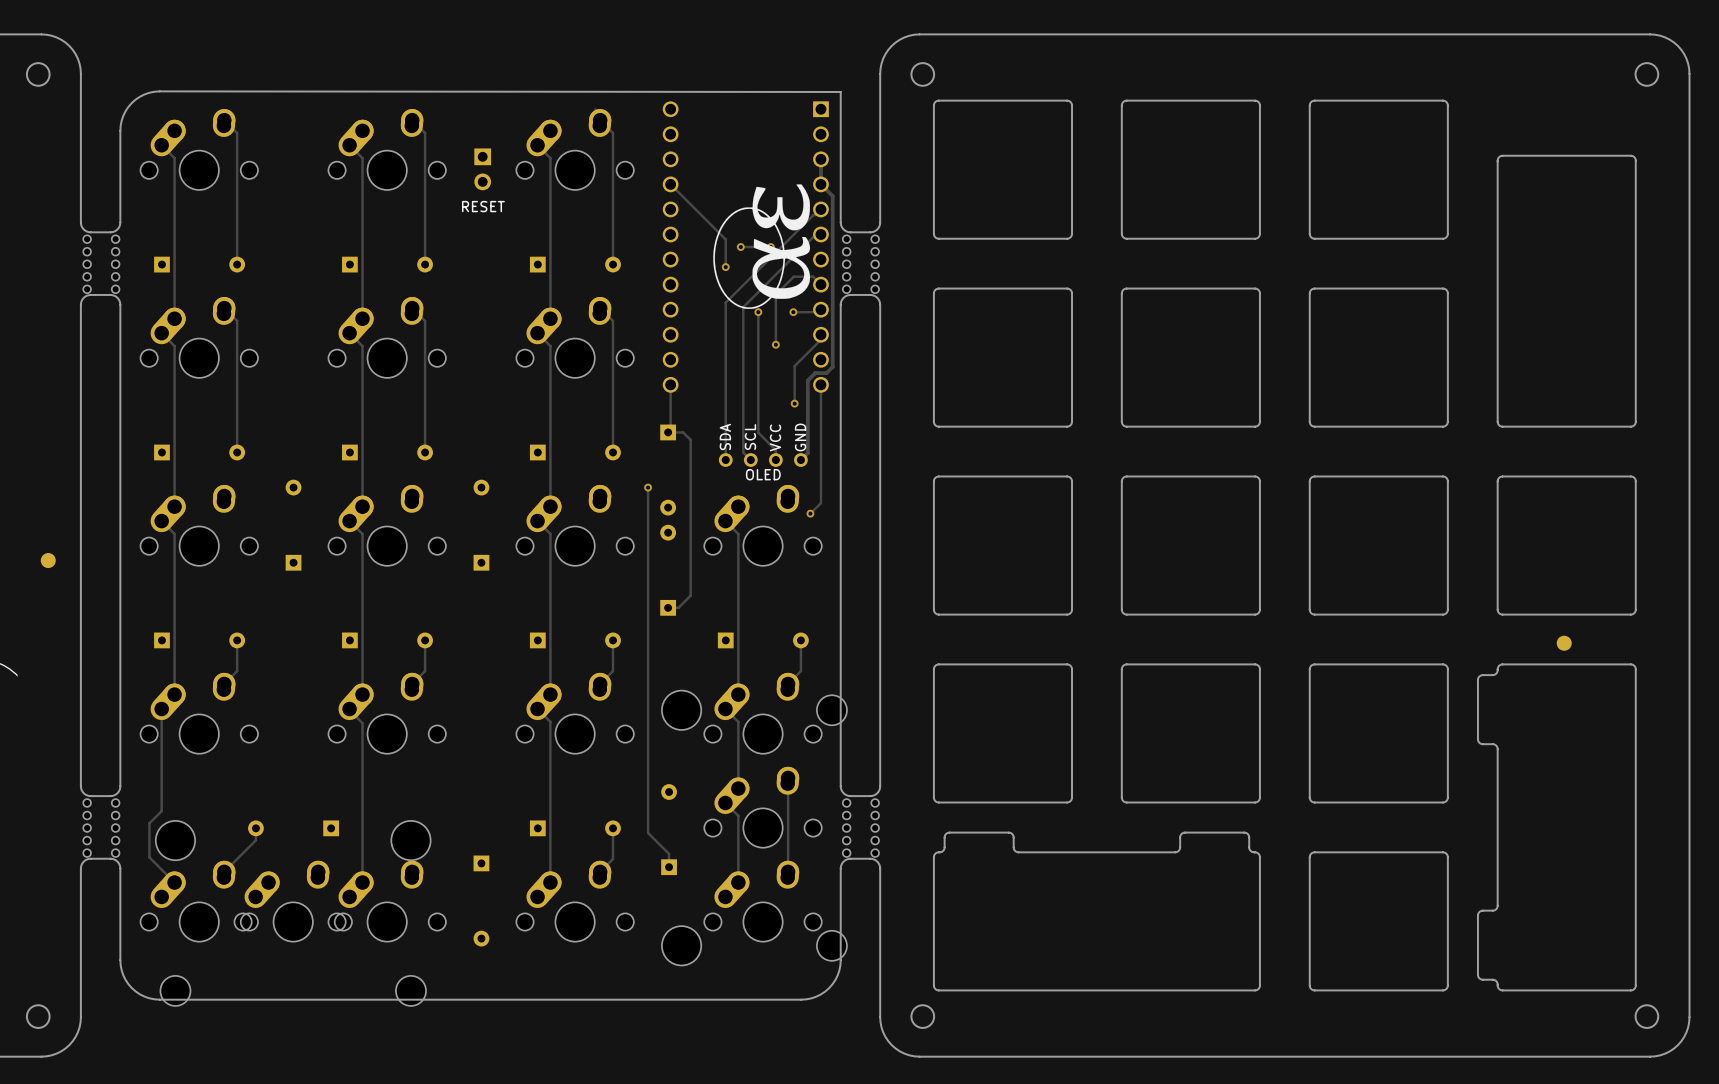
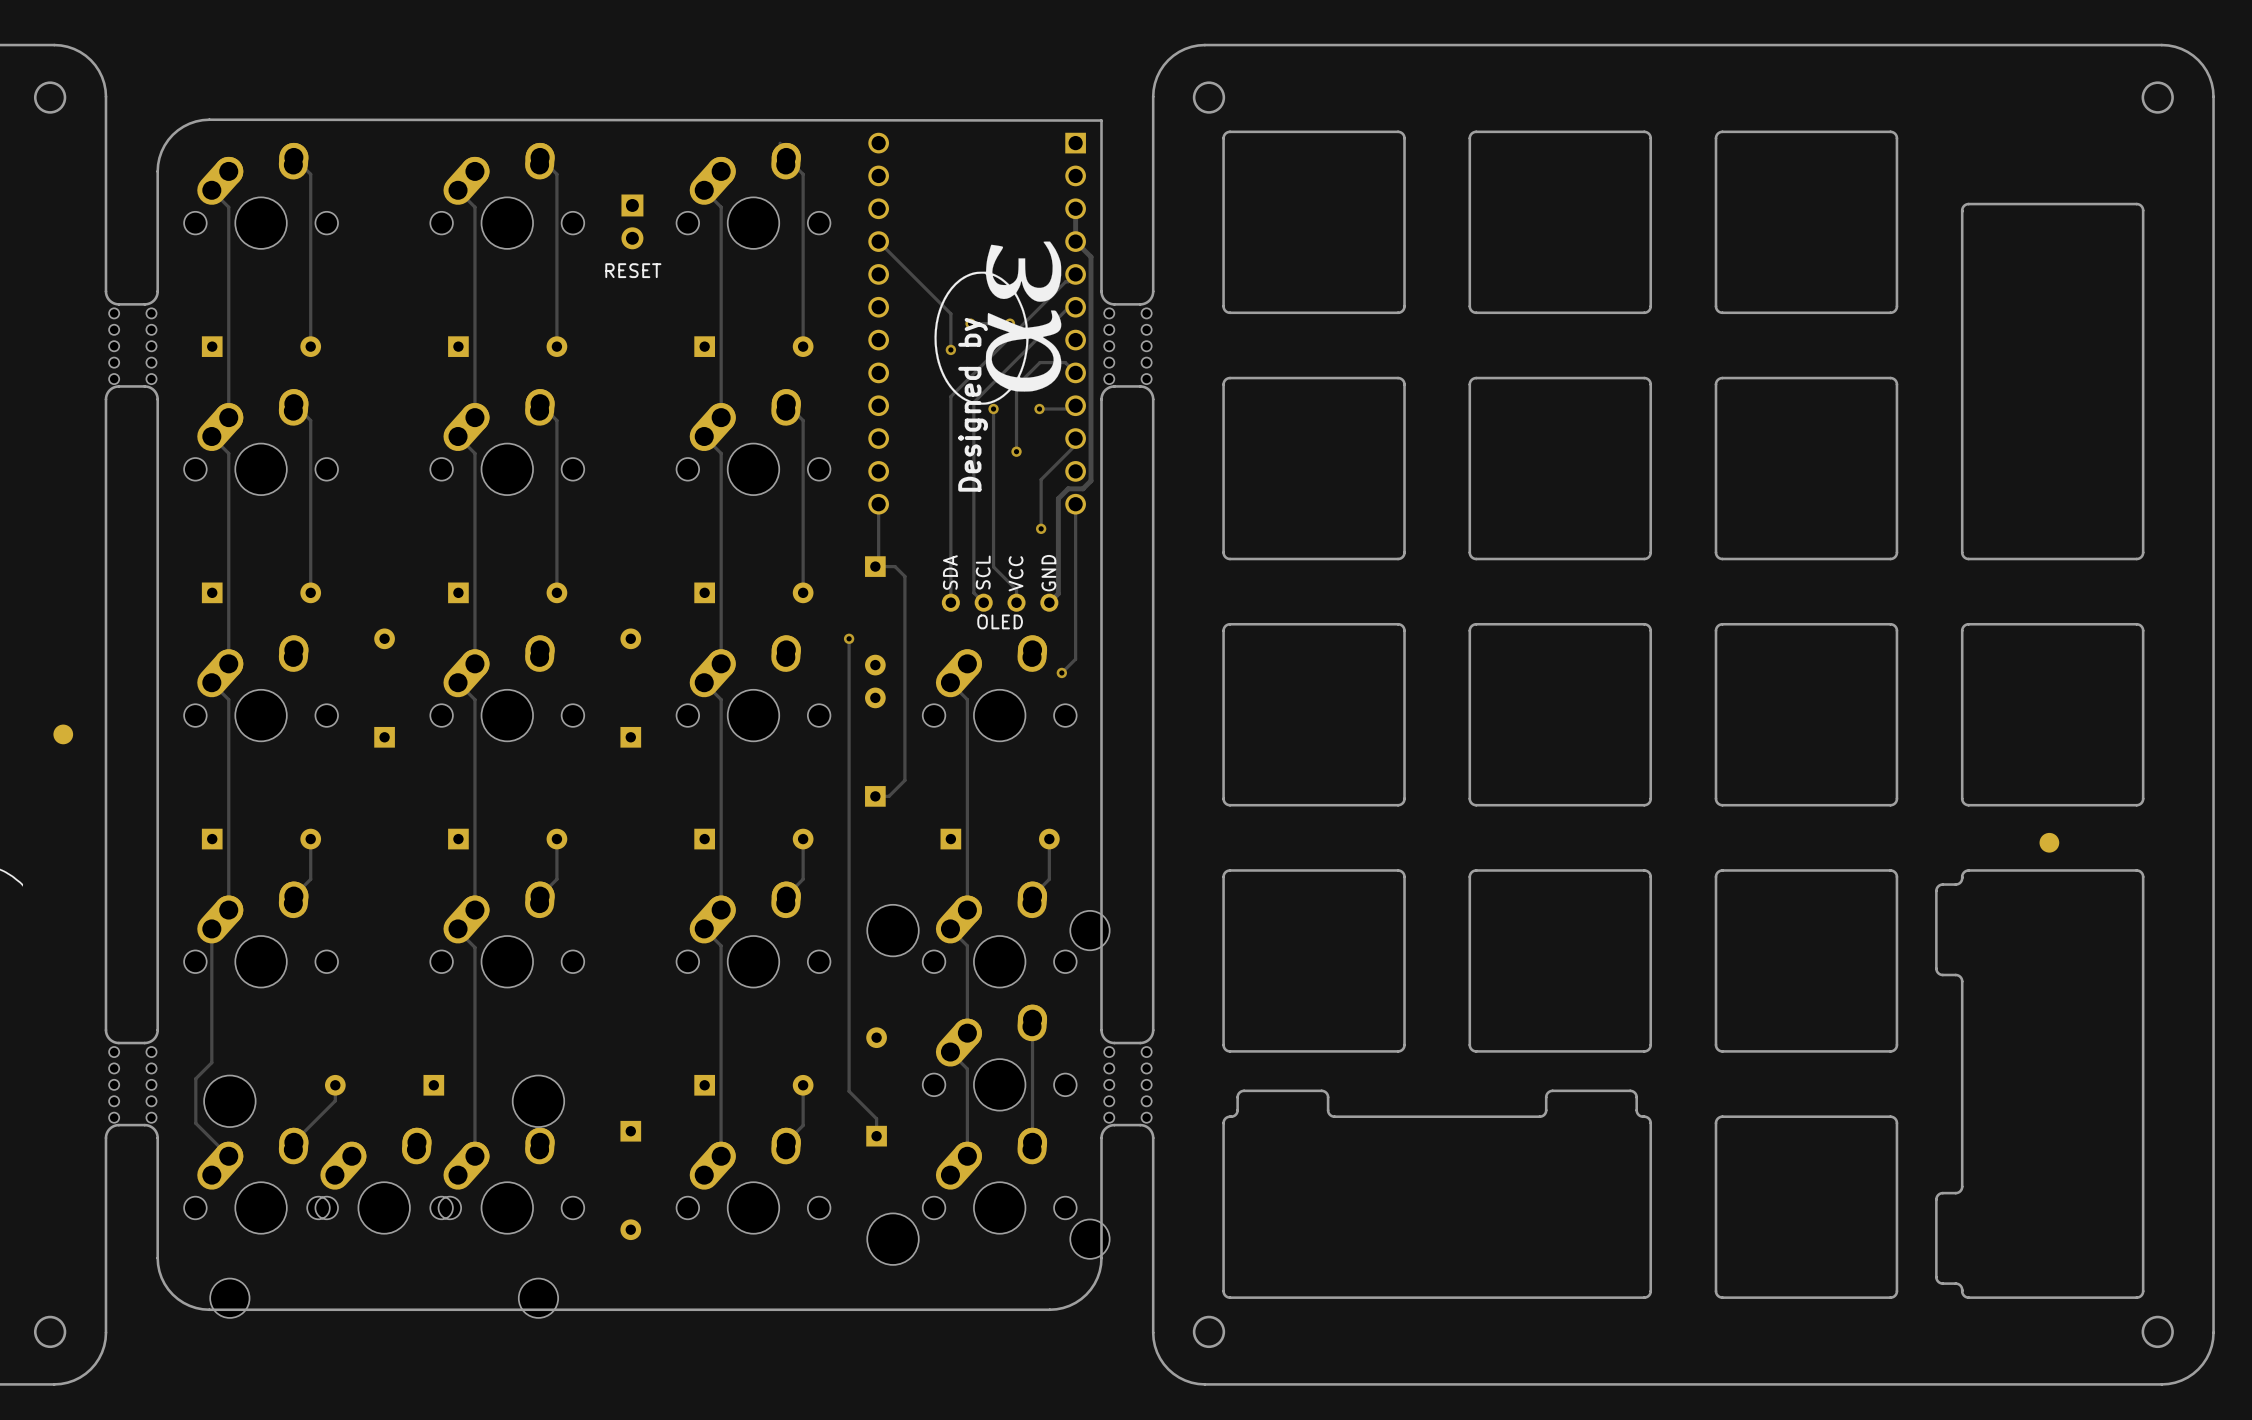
text: none -> Designed by (973, 404)

